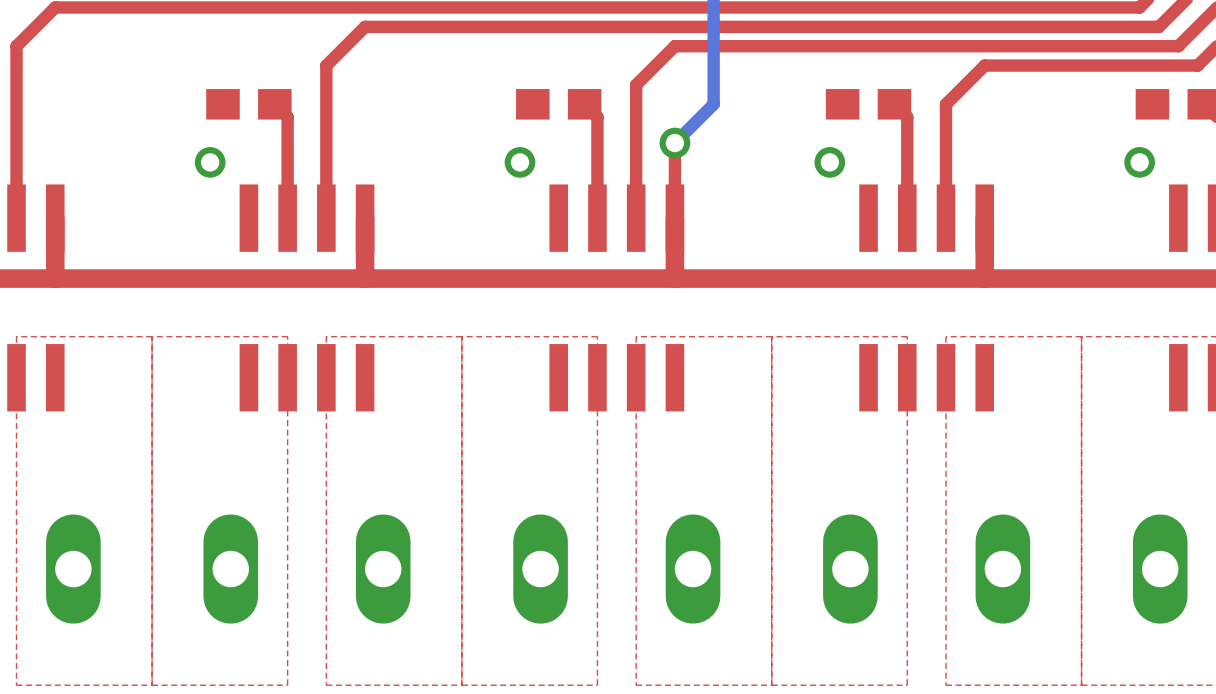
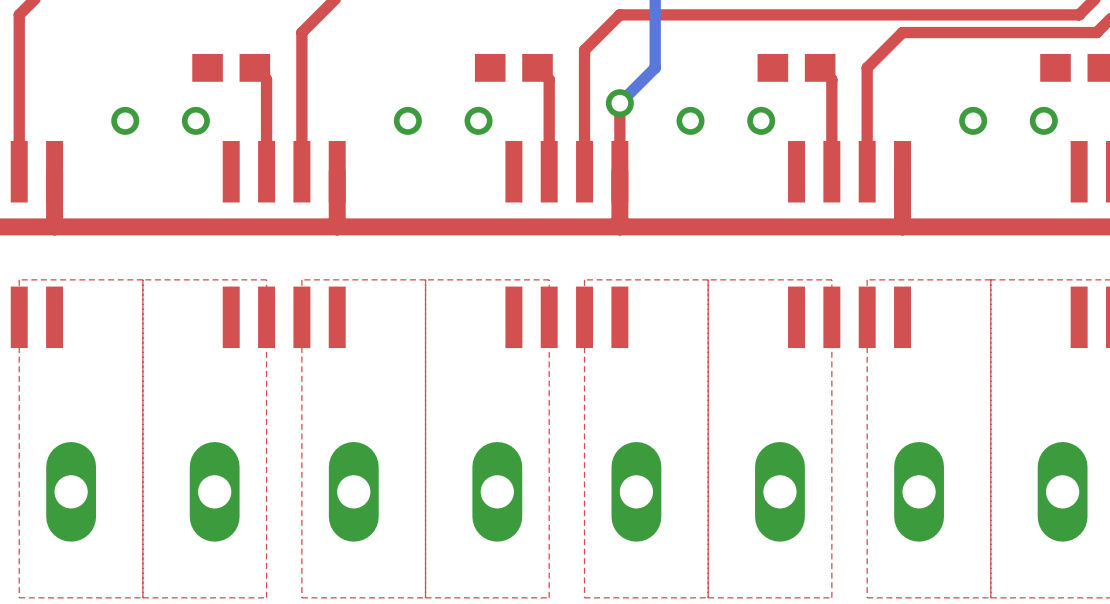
via: none -> (125, 120)
via: none -> (407, 120)
via: none -> (690, 120)
via: none -> (973, 120)

